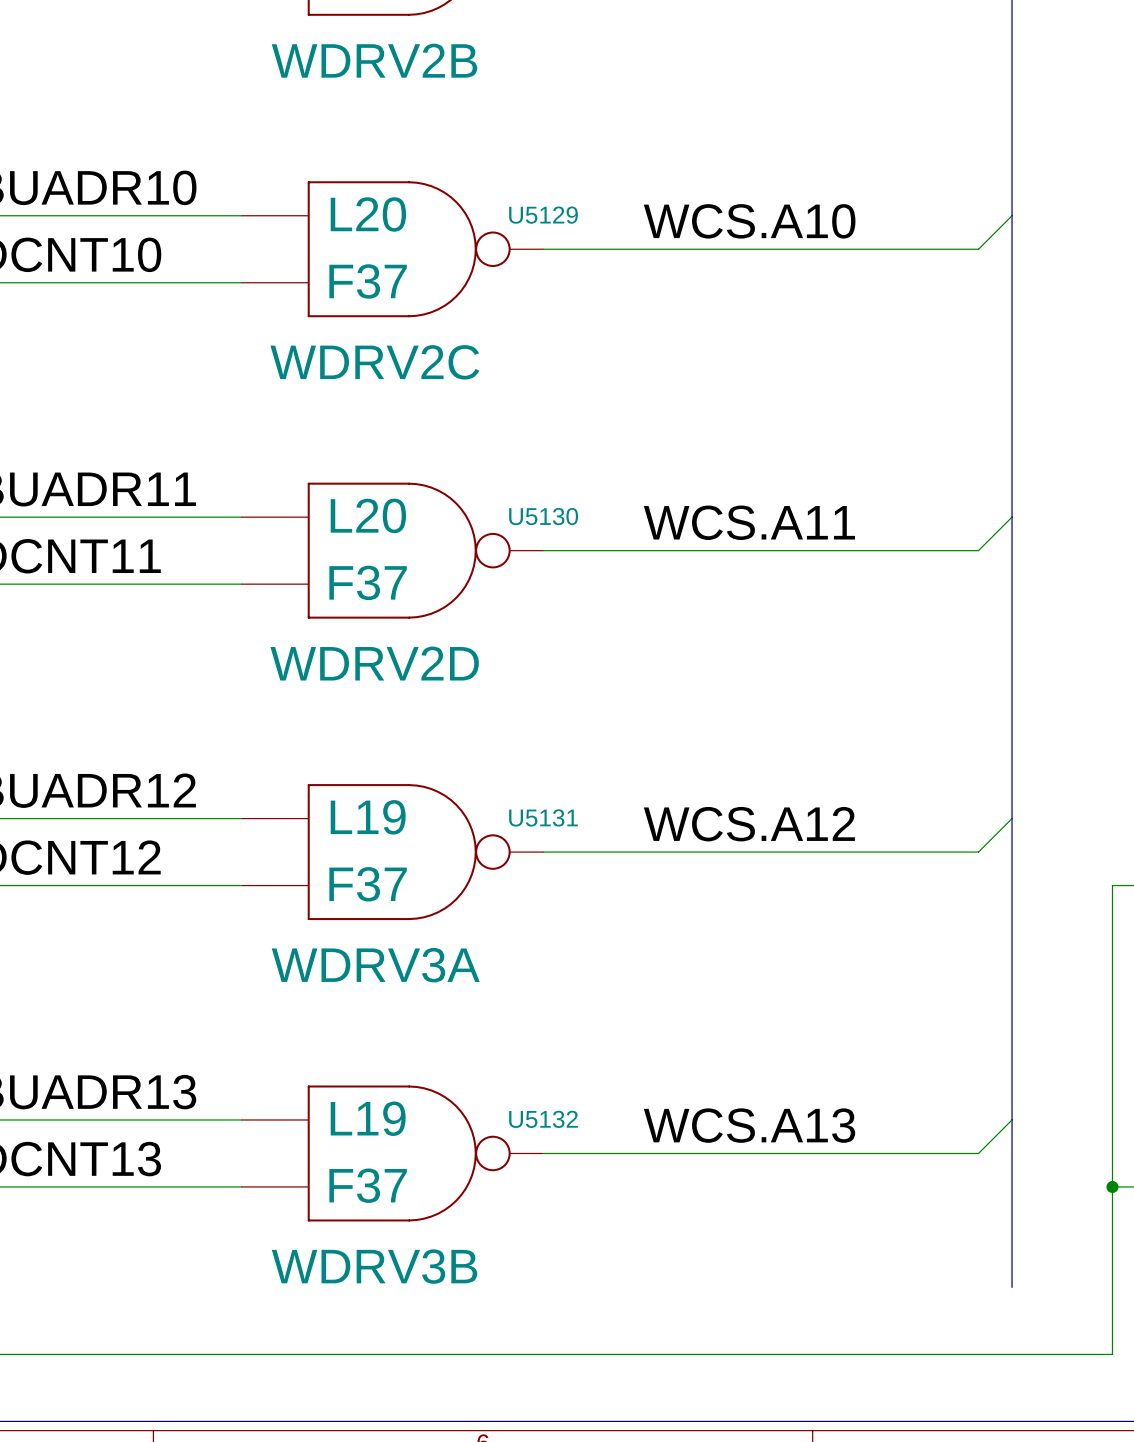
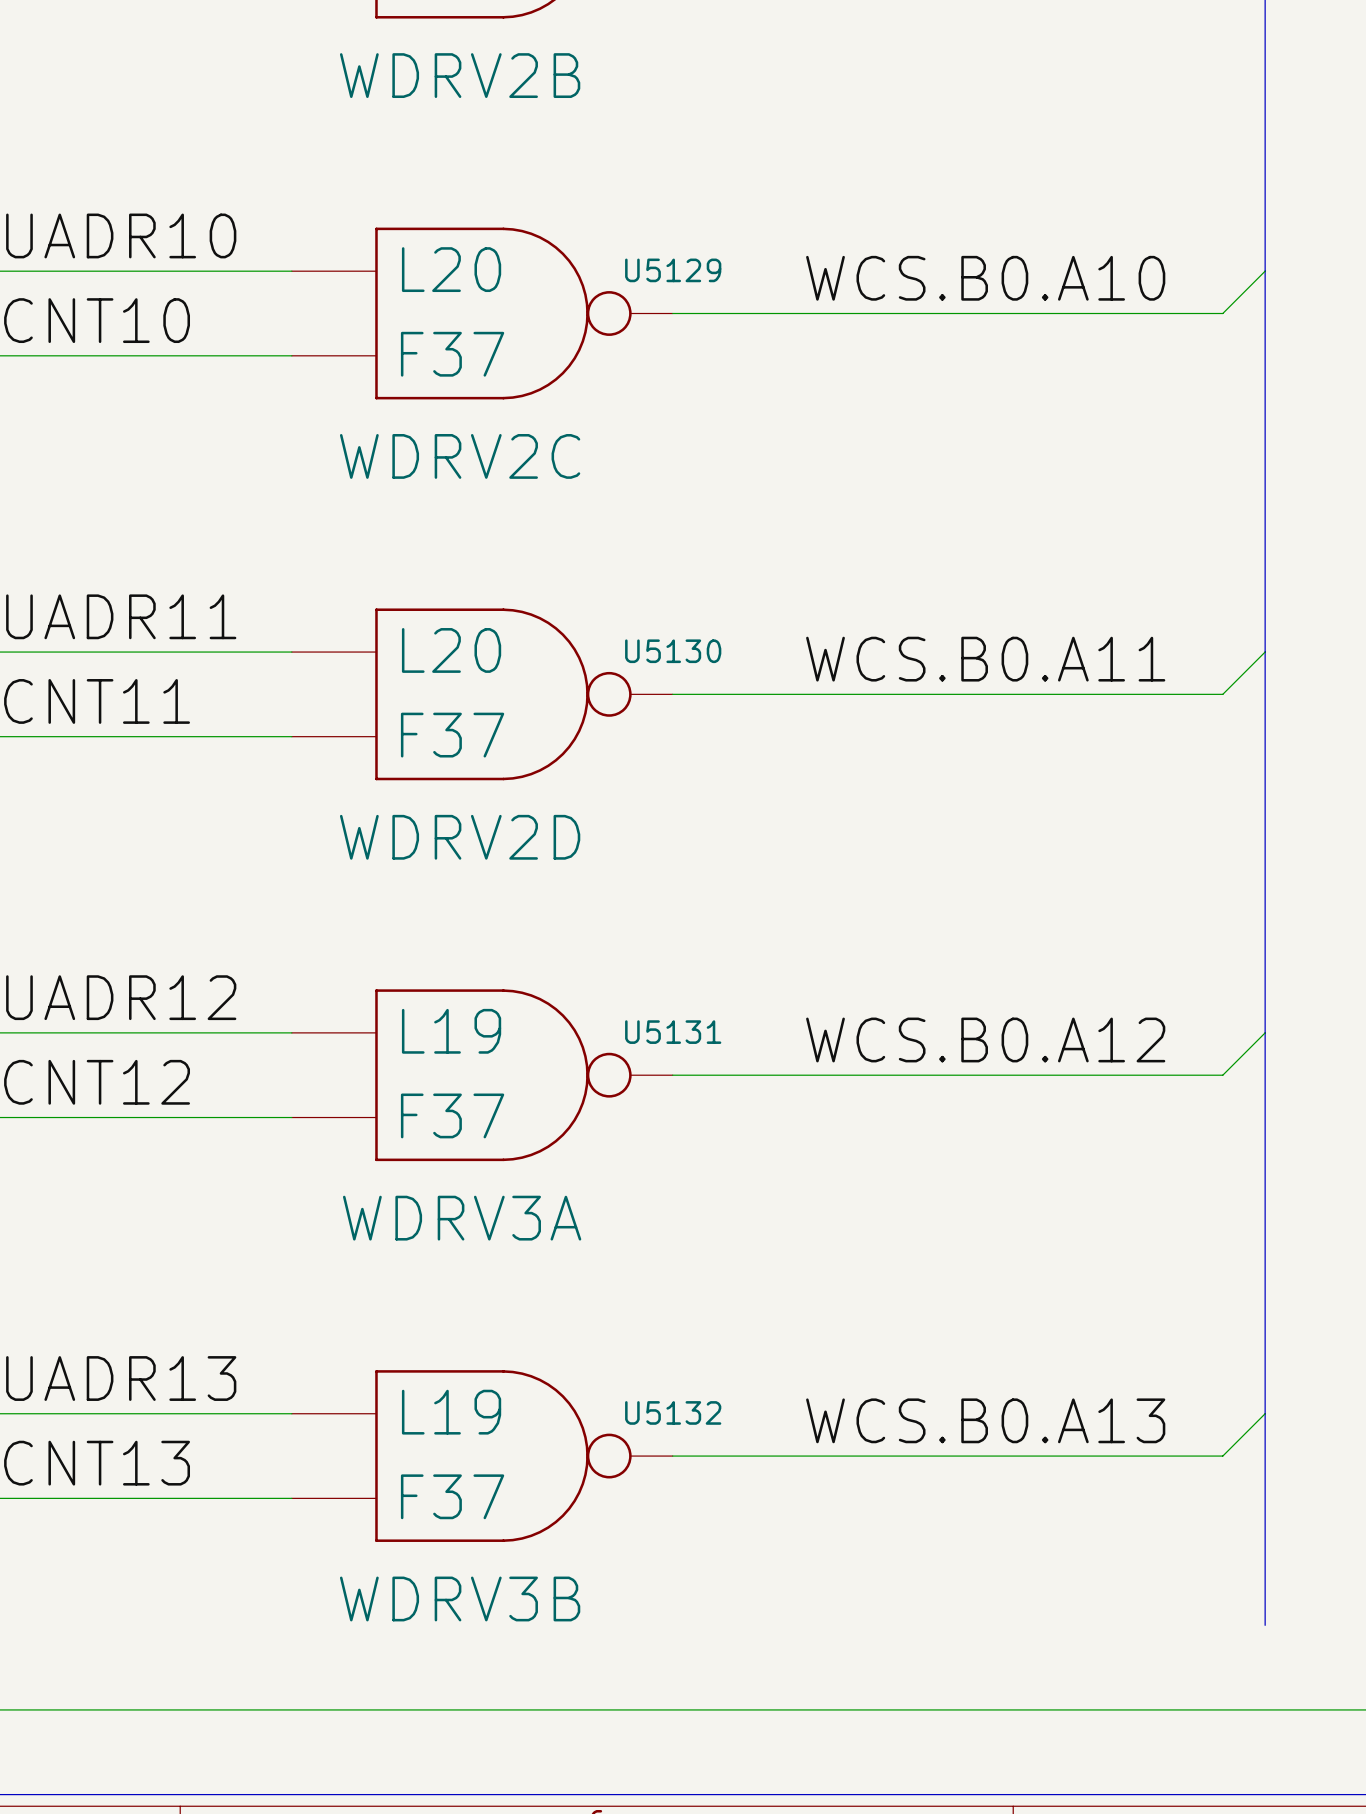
label: WCS.A10 (749, 221) -> WCS.B0.A10 (985, 278)
label: WCS.A11 (749, 522) -> WCS.B0.A11 (985, 659)
label: WCS.A12 (749, 824) -> WCS.B0.A12 (985, 1039)
label: WCS.A13 (749, 1125) -> WCS.B0.A13 (985, 1420)

